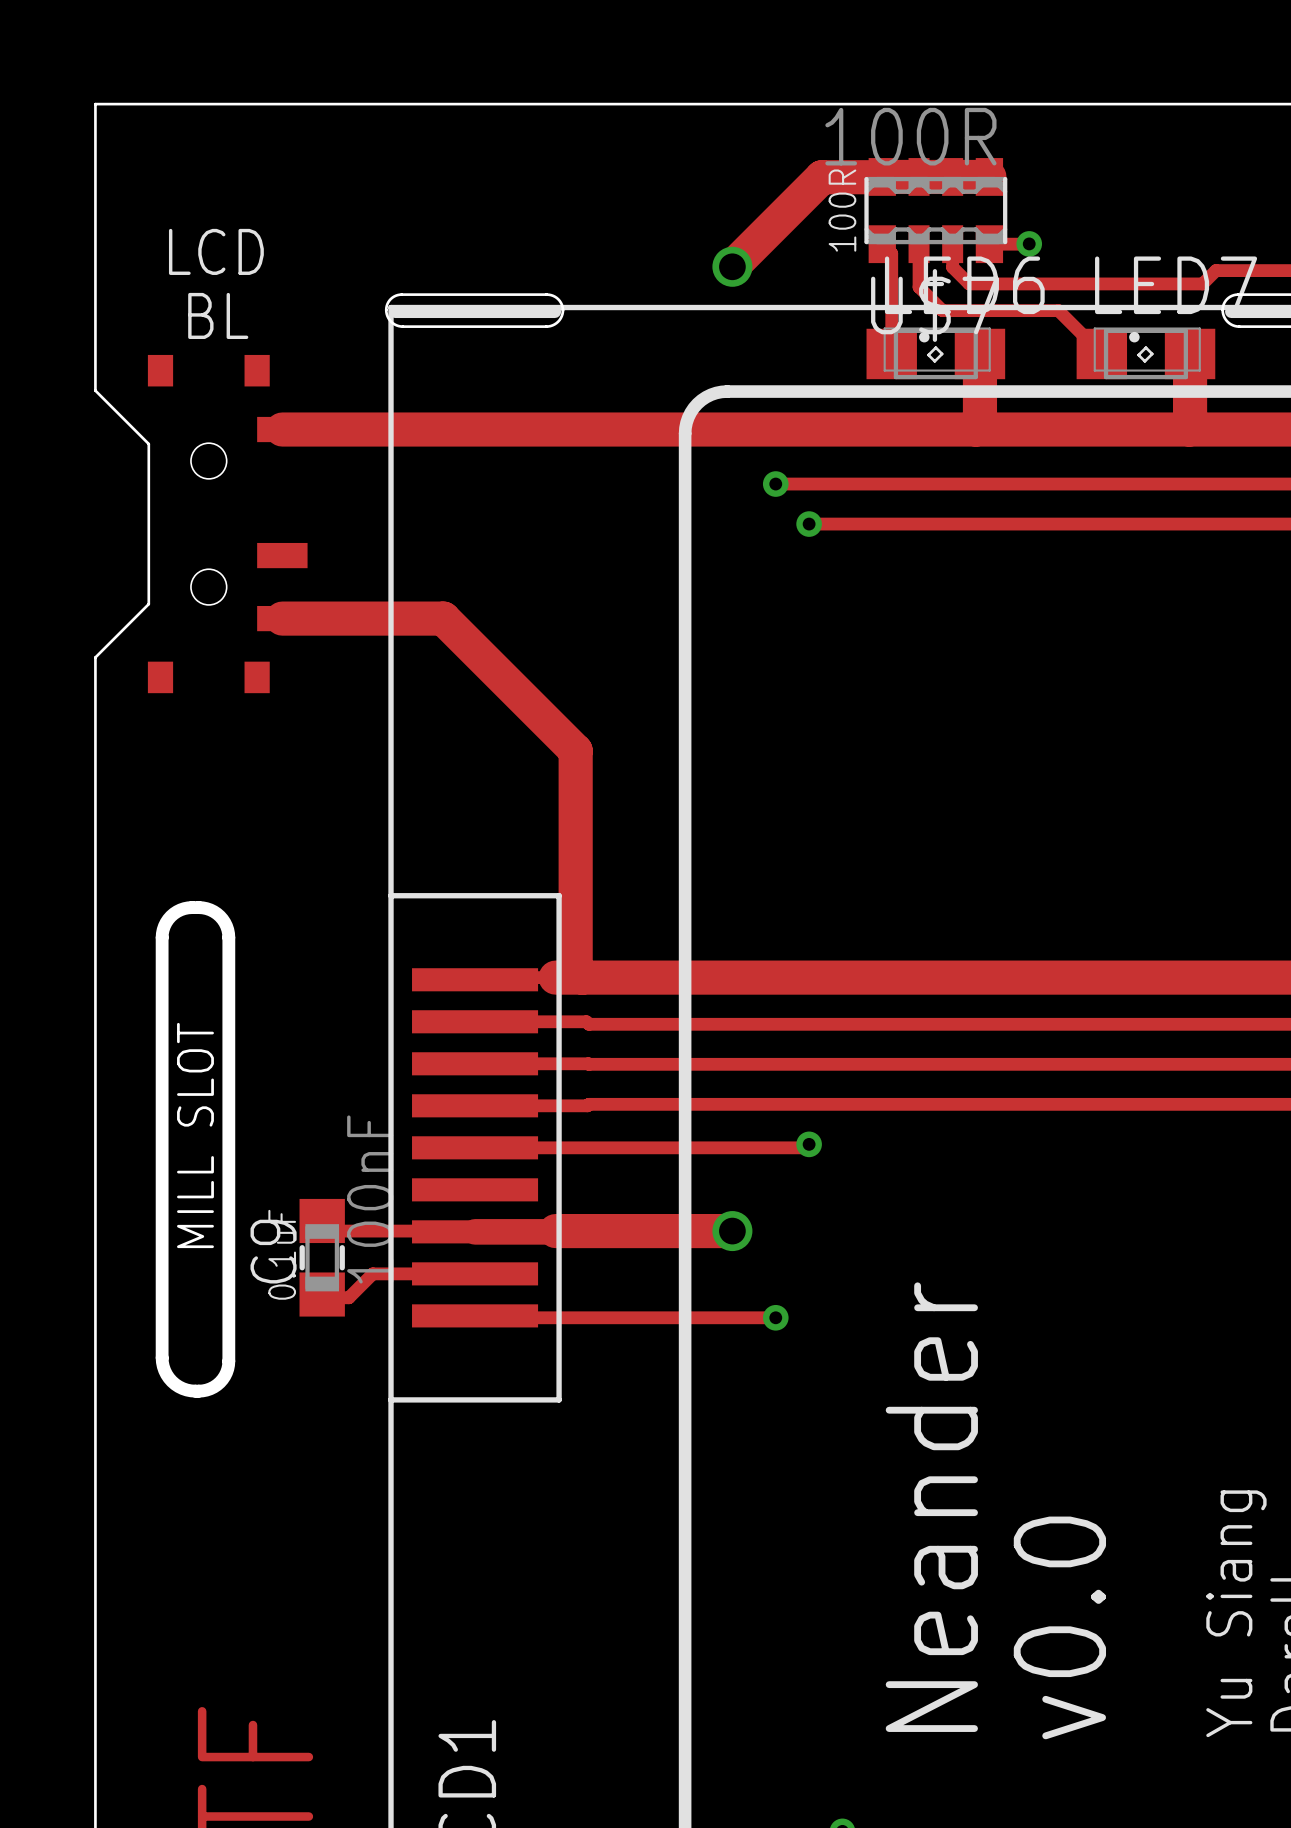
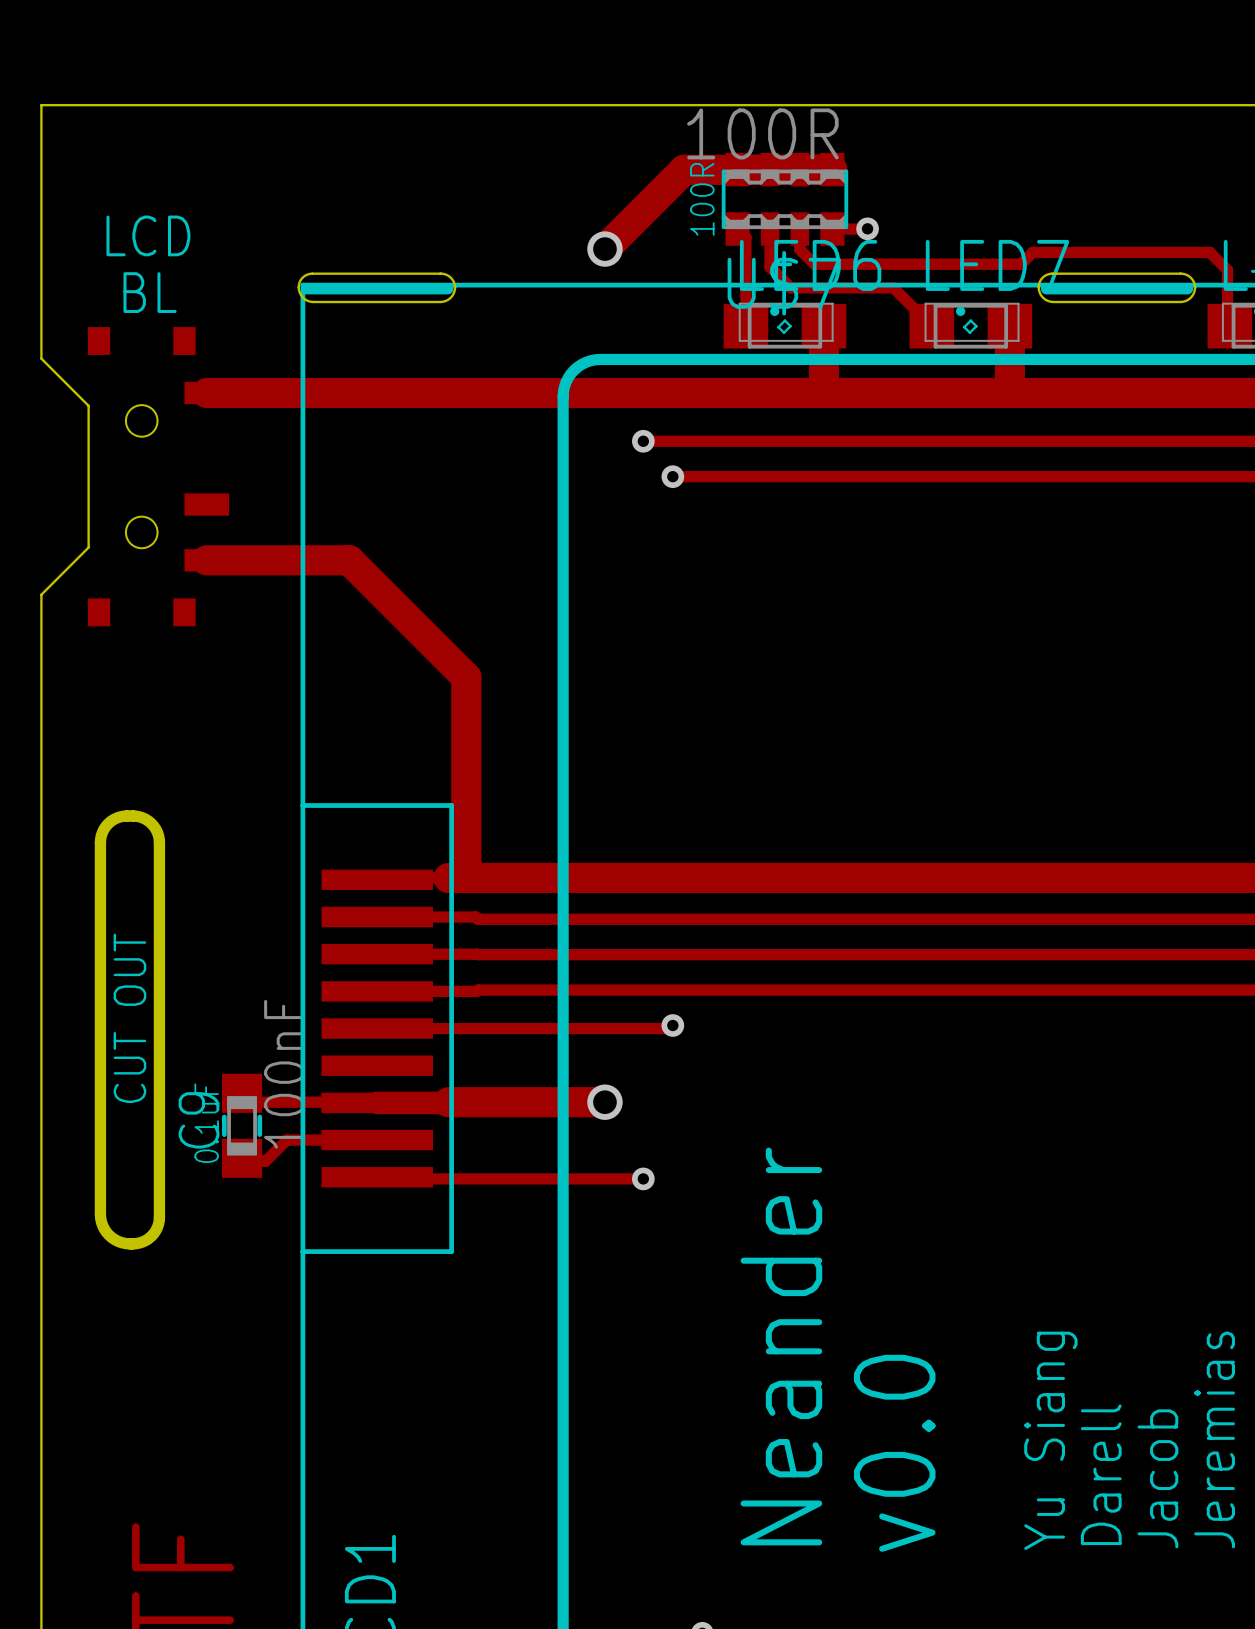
text: MILL SLOT (195, 1135) -> CUT OUT (129, 1018)

